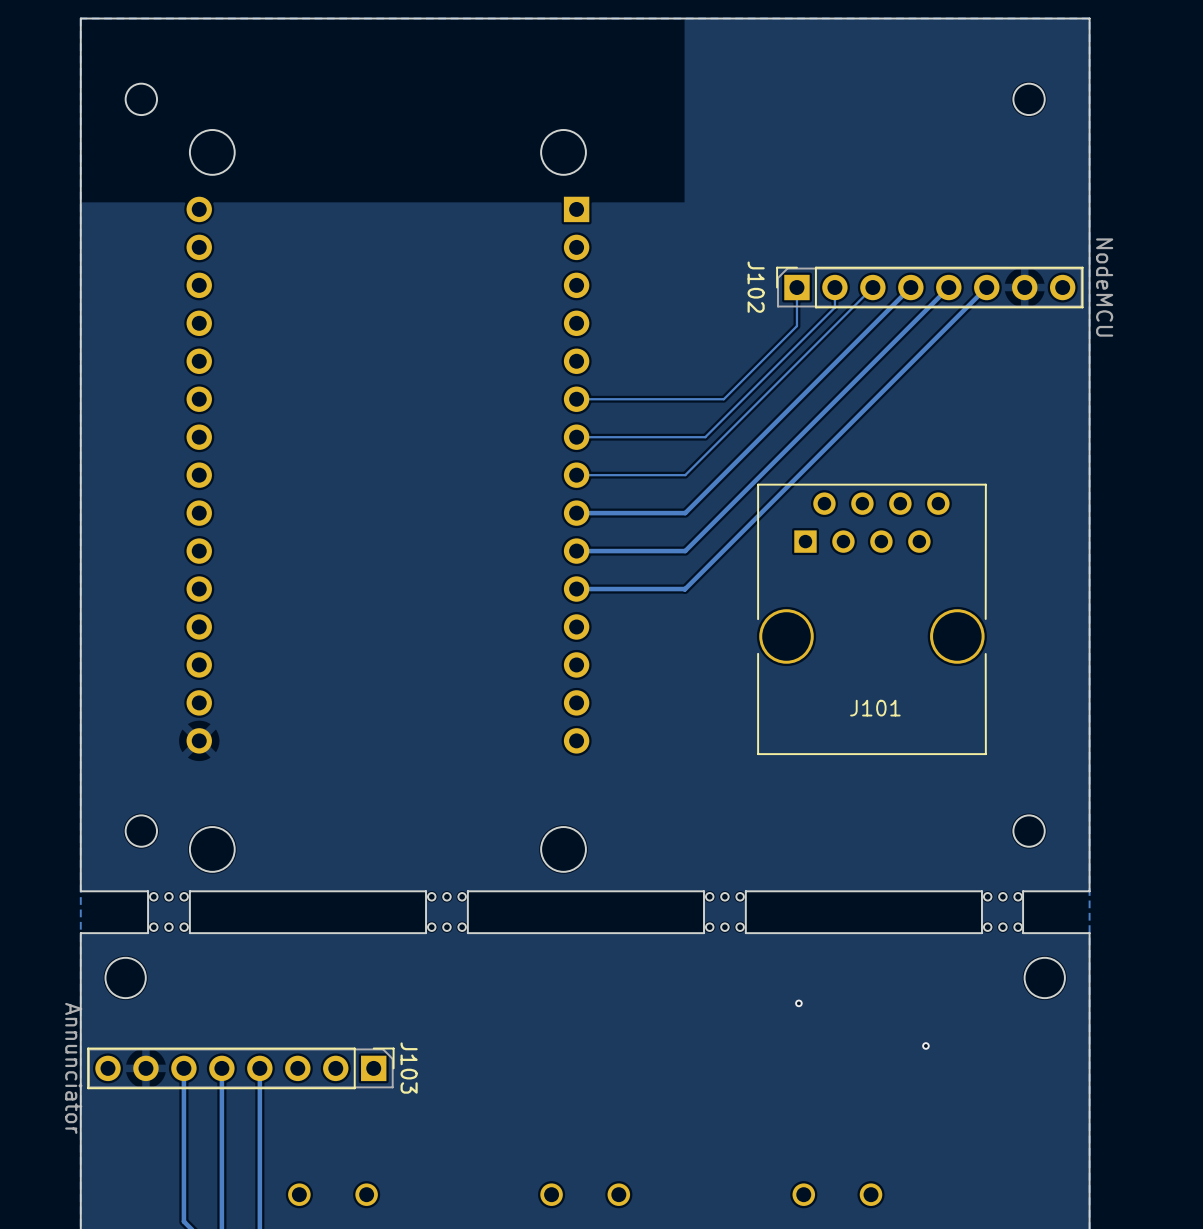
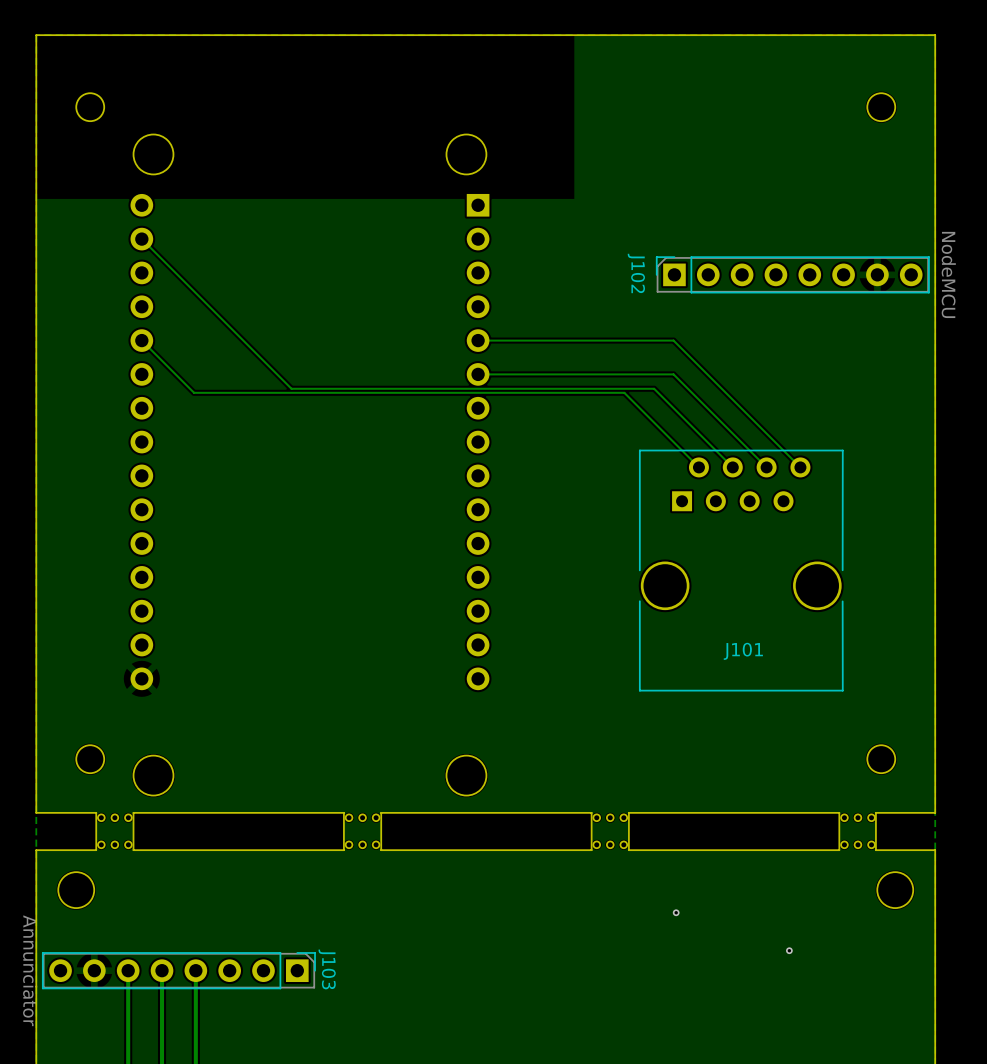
track: none -> (141, 239) (291, 388) (654, 388) (732, 467)
track: (796, 287) (796, 326) (723, 399) -> (766, 467) (673, 374) (609, 374)
track: (834, 287) (834, 307) (705, 437) (576, 437) -> none
track: (872, 287) (685, 475) (576, 475) -> none
track: (910, 287) (685, 513) (576, 513) -> none
track: (948, 287) (685, 551) (576, 551) -> none
track: (986, 287) (684, 589) (576, 589) -> none
track: none -> (141, 340) (194, 392) (624, 392) (698, 467)
track: none -> (478, 340) (673, 340) (800, 467)

